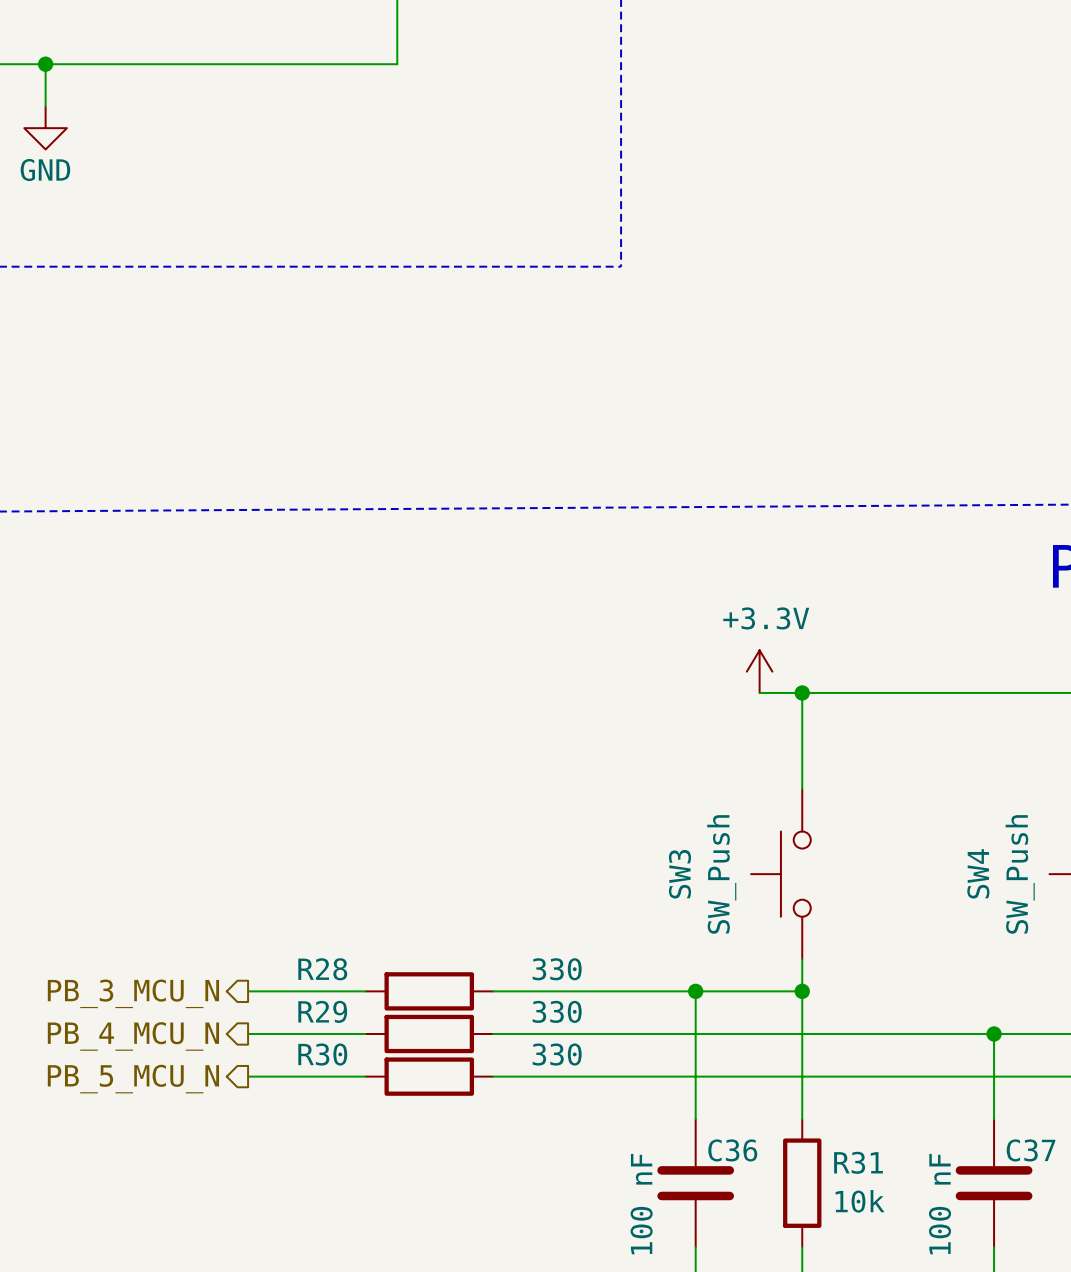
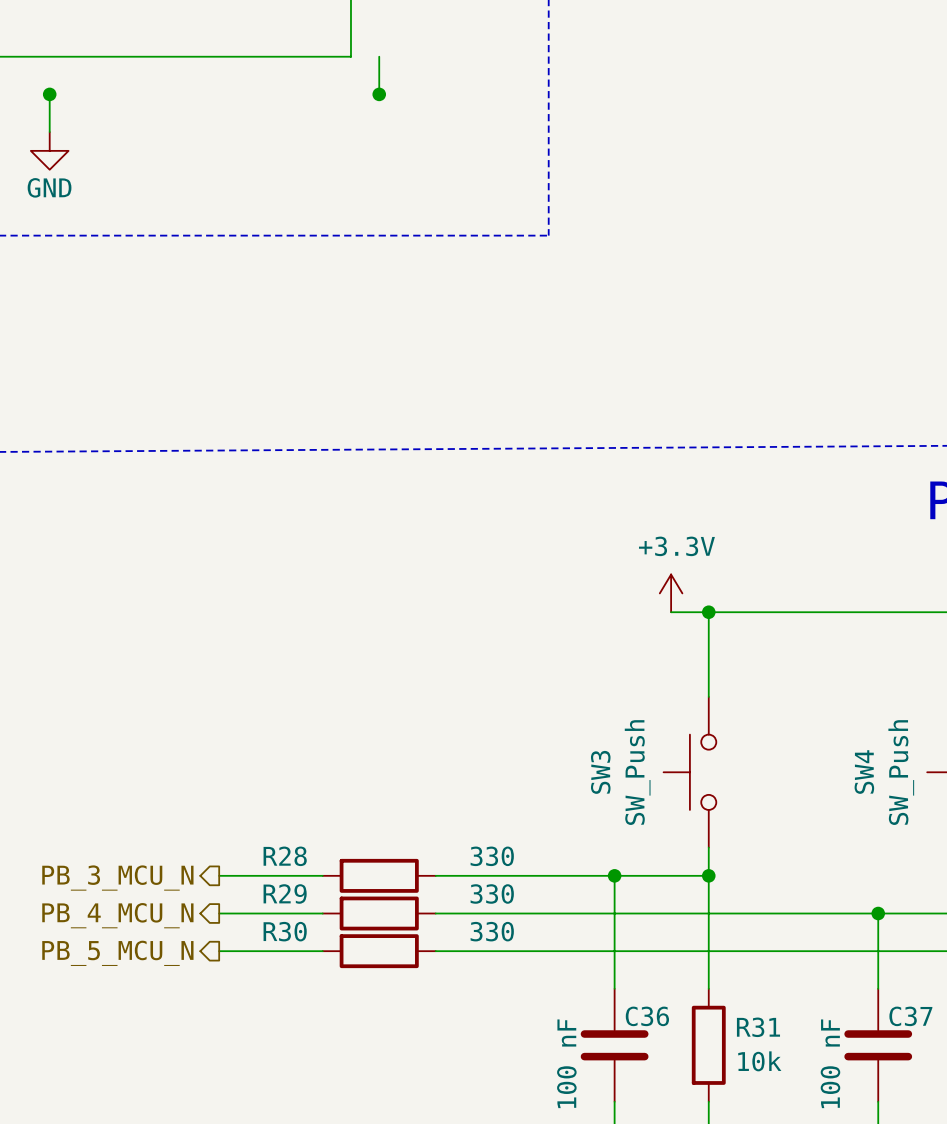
wire: (45, 64) (45, 106) -> (49, 94) (49, 132)
junction position: (45, 64) -> (49, 94)
wire: none -> (379, 56) (379, 94)
junction: none -> (379, 94)
power symbol position: GND (45, 128) -> GND (49, 150)

